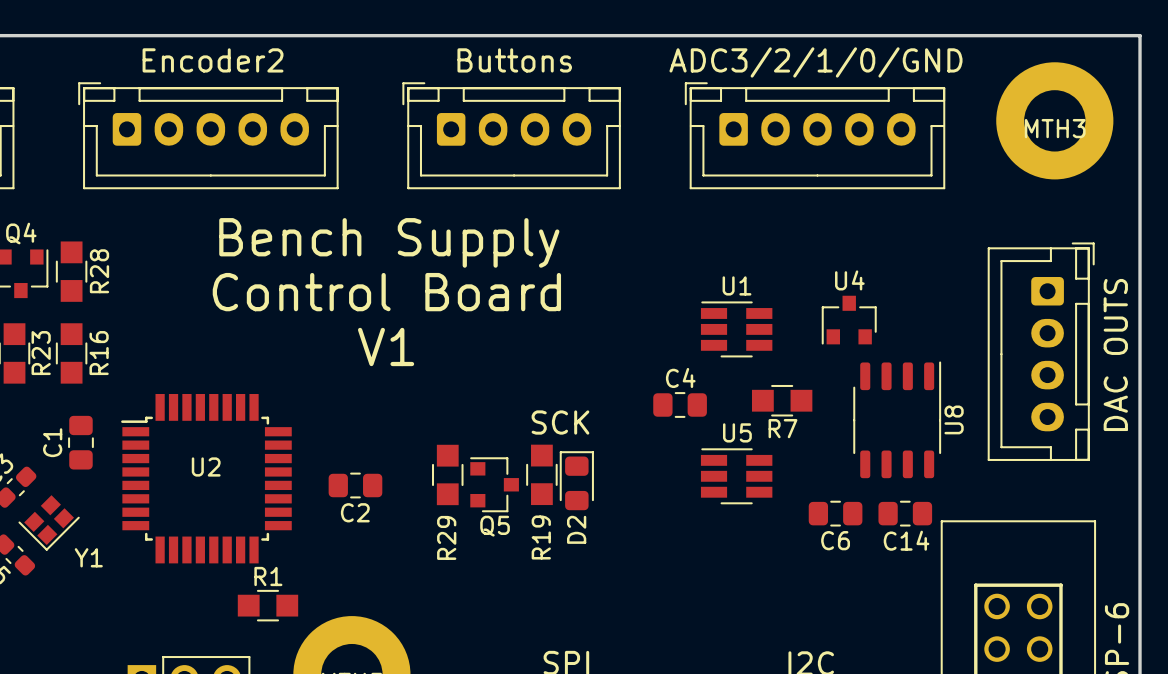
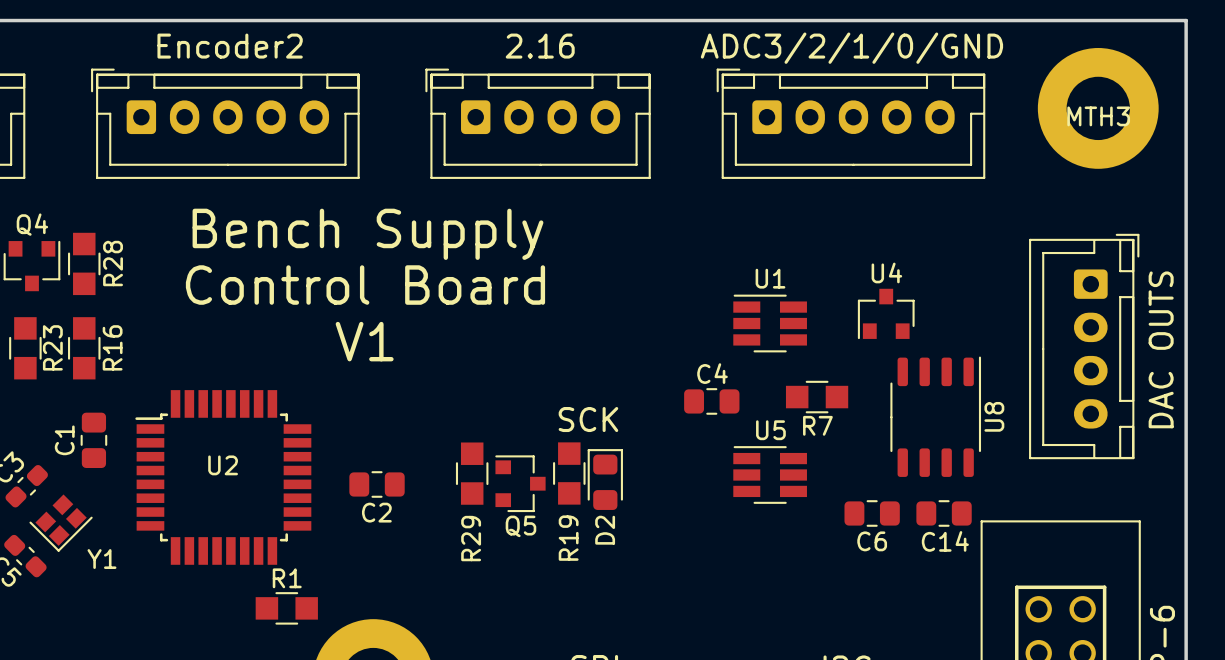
text: Buttons (514, 60) -> 2.16 (540, 46)
text position: Bench Supply (389, 242) -> Bench Supply (367, 234)
text position: Control Board (386, 292) -> Control Board (365, 285)
text position: V1 (386, 346) -> V1 (364, 341)

